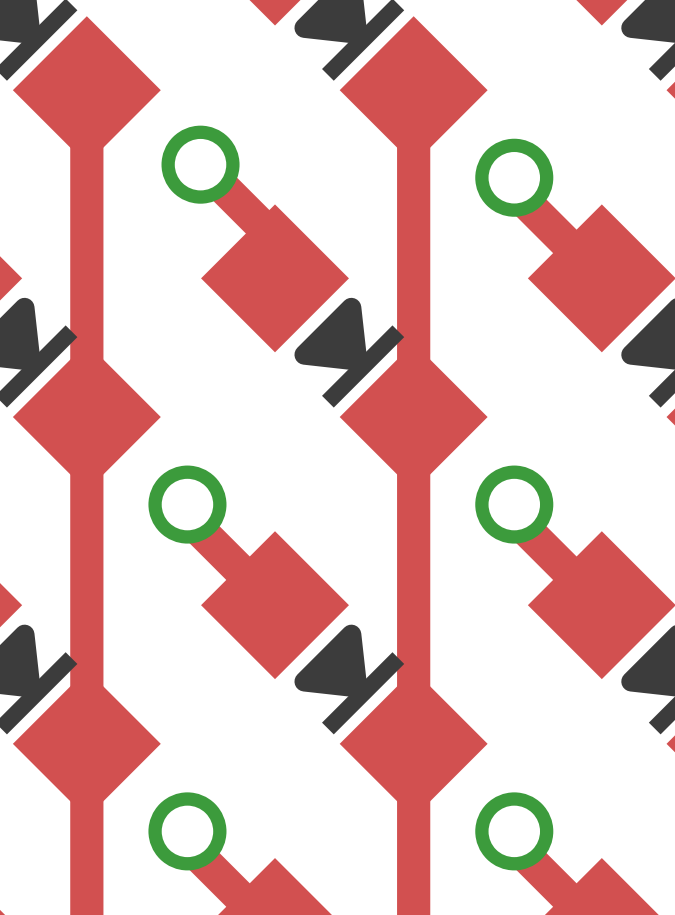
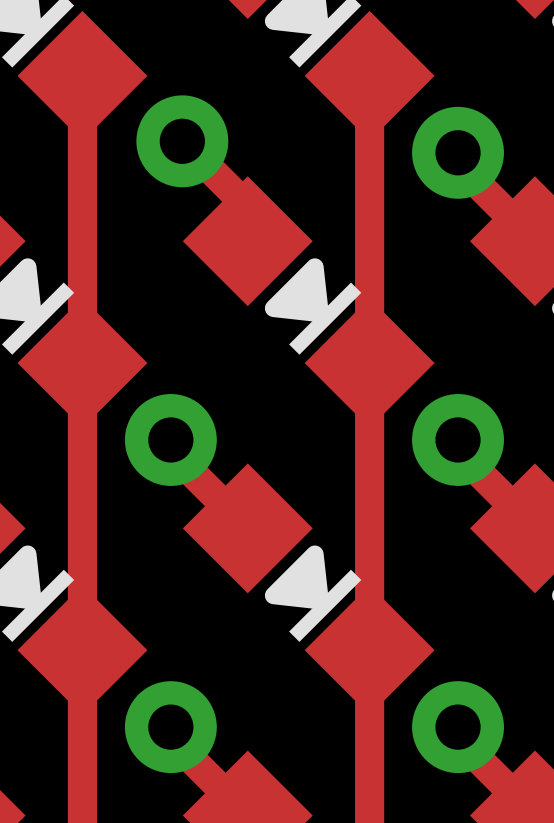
via size: [161, 125, 240, 204] -> [136, 95, 229, 188]
via size: [475, 138, 554, 217] -> [412, 106, 504, 199]
via size: [148, 465, 227, 544] -> [124, 394, 217, 486]
via size: [475, 465, 554, 544] -> [412, 394, 504, 486]
via size: [148, 792, 227, 871] -> [124, 681, 217, 774]
via size: [475, 792, 554, 871] -> [412, 681, 504, 774]

